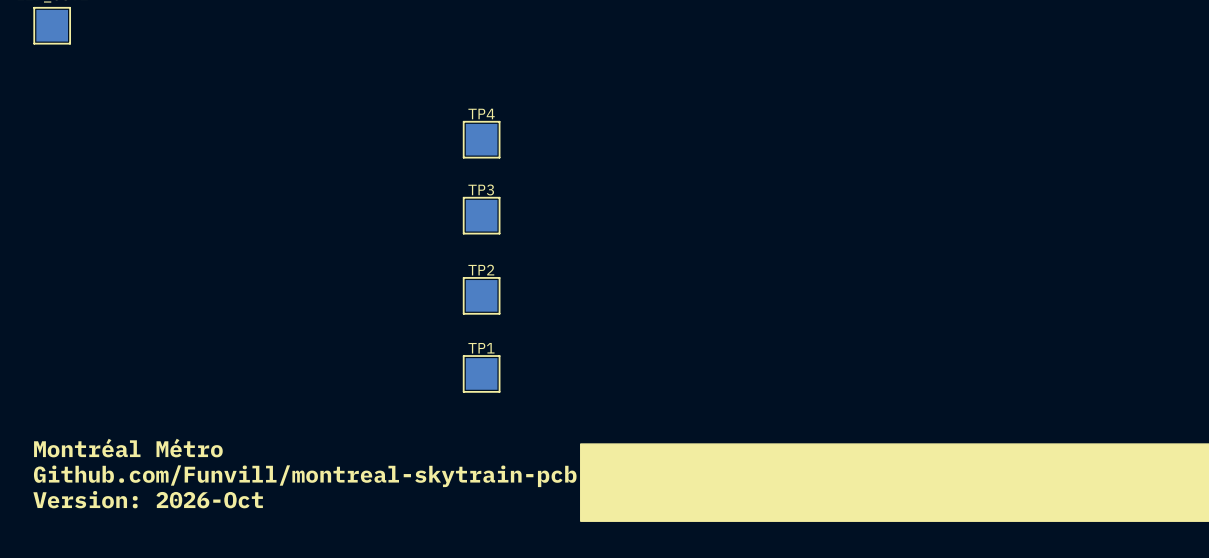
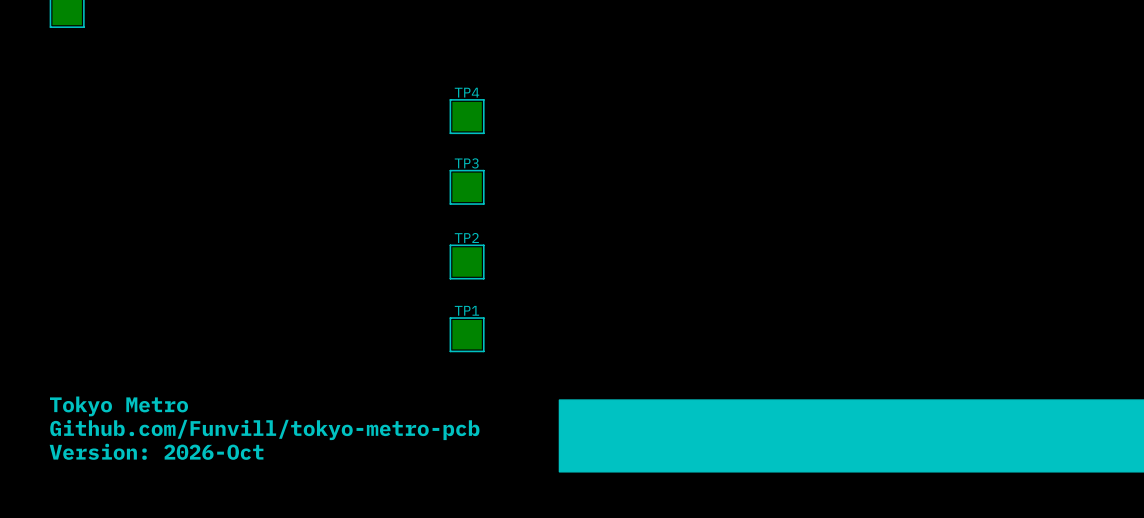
text: Montréal Métro (128, 448) -> Tokyo Metro (119, 406)
text: Github.com/Funvill/montreal-skytrain-pcb (305, 476) -> Github.com/Funvill/tokyo-metro-pcb (264, 429)

